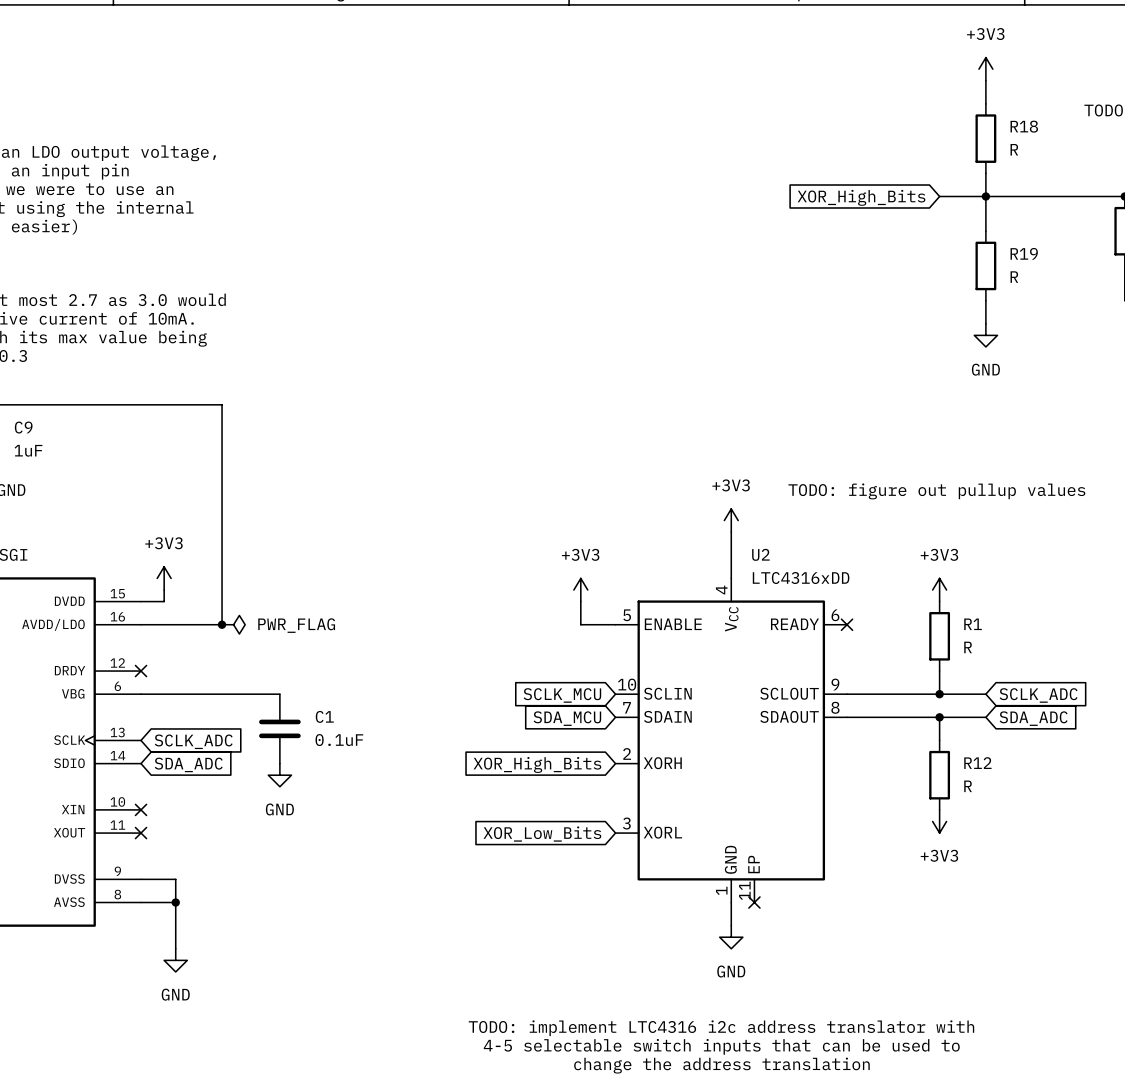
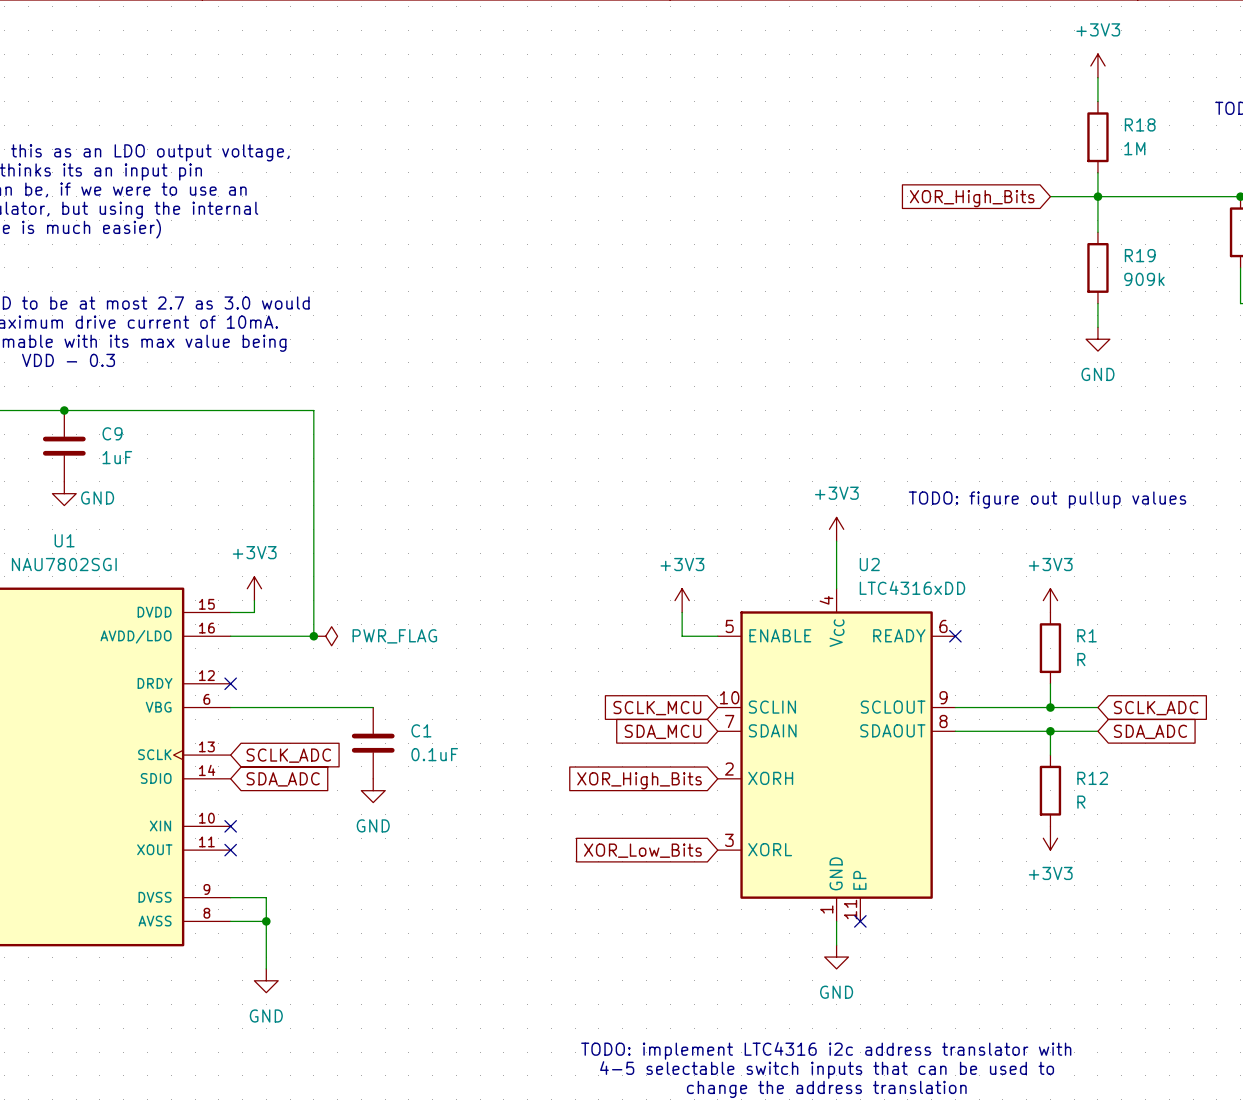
R18 value: R (1014, 149) -> 1M (1134, 148)
R19 value: R (1014, 277) -> 909k (1144, 279)

